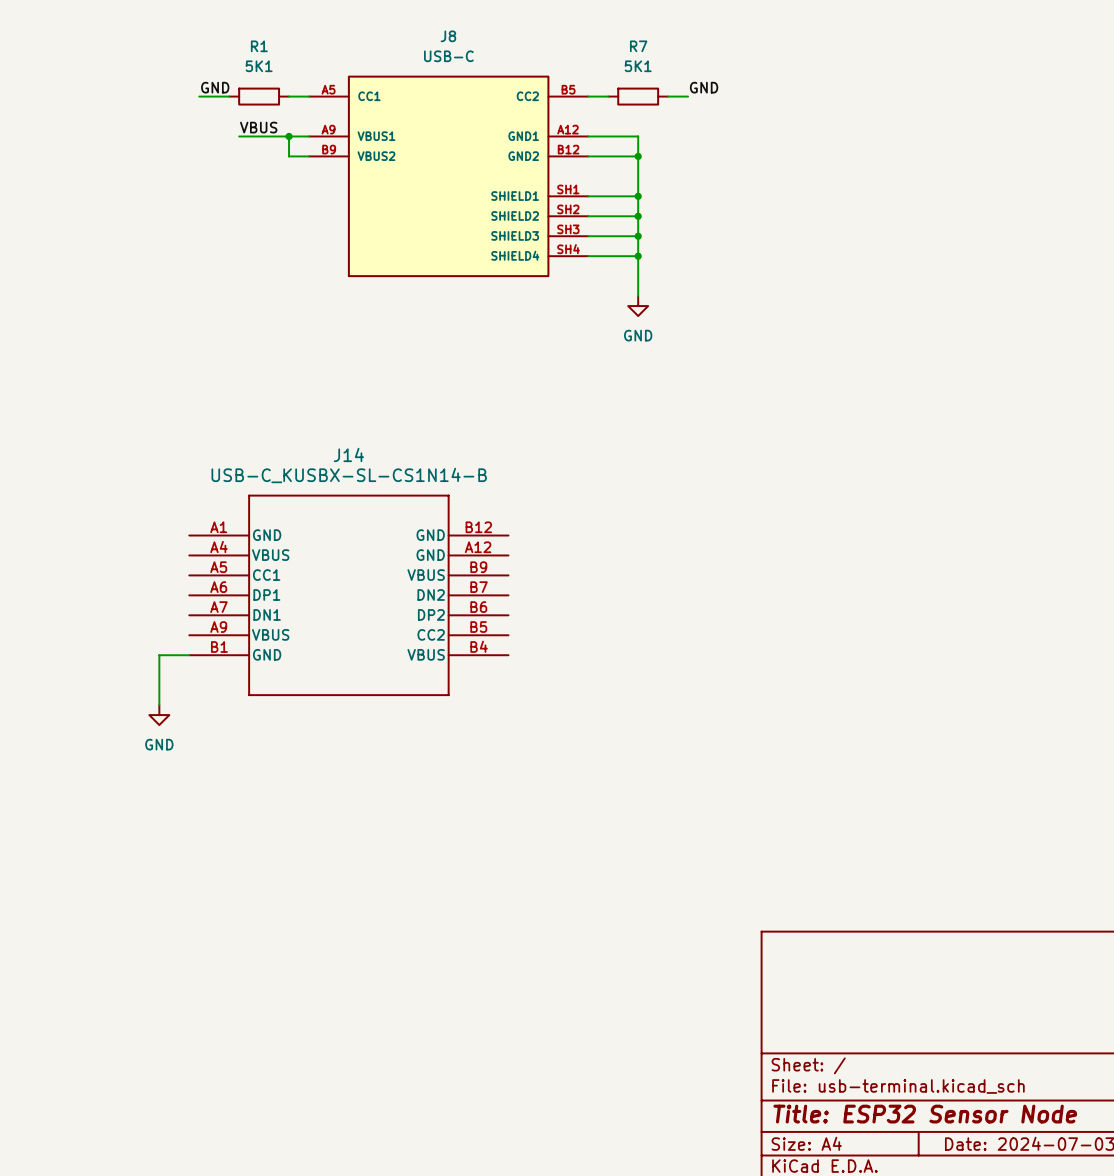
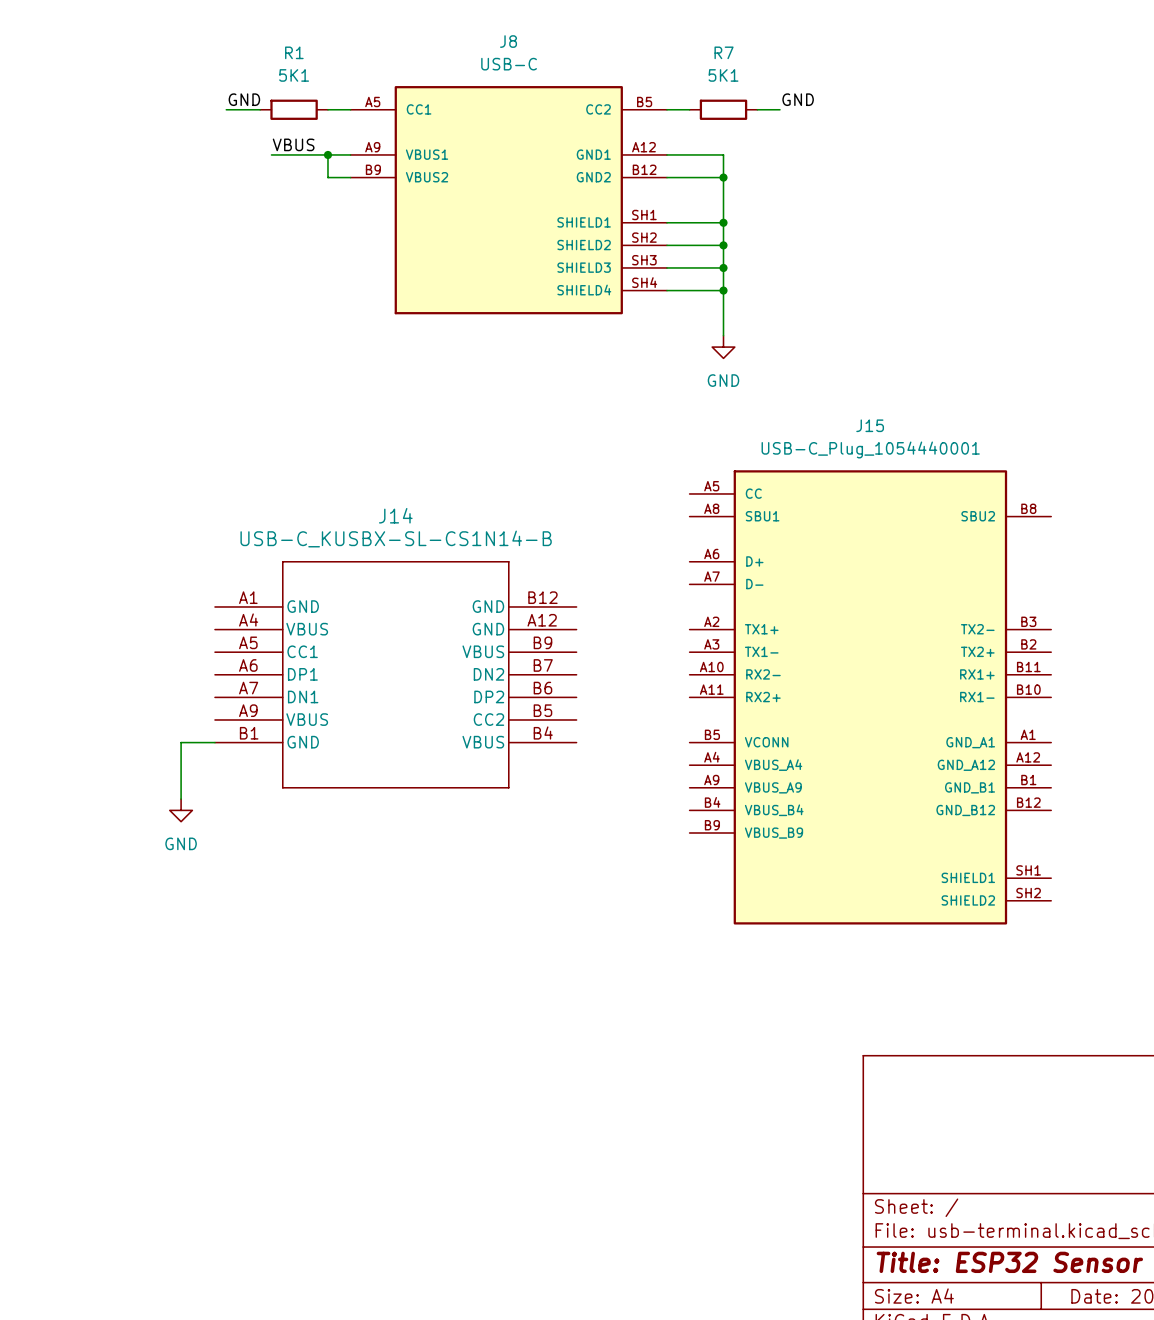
J15: none -> USB-C_Plug_1054440001 (870, 697)

